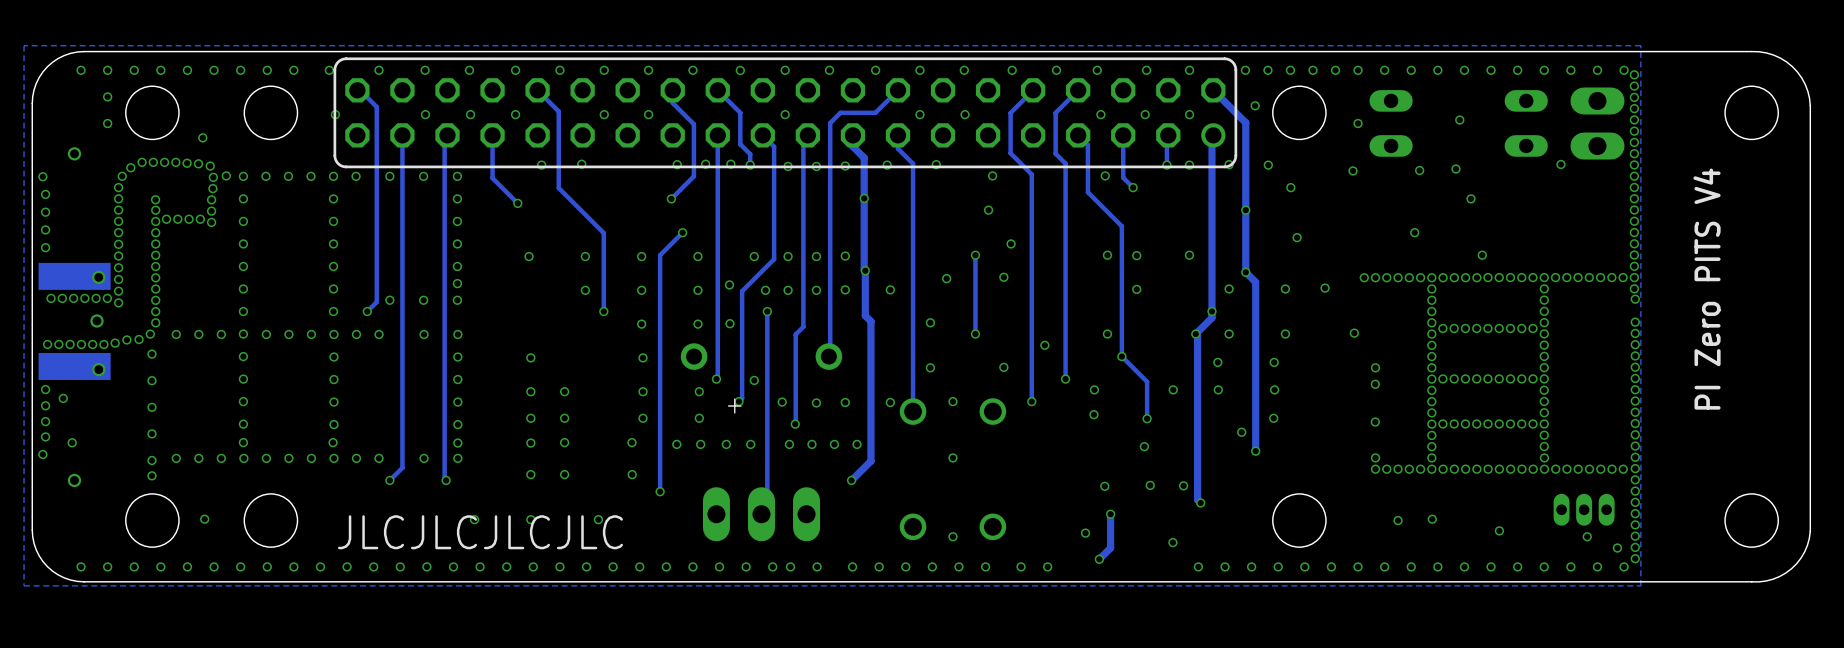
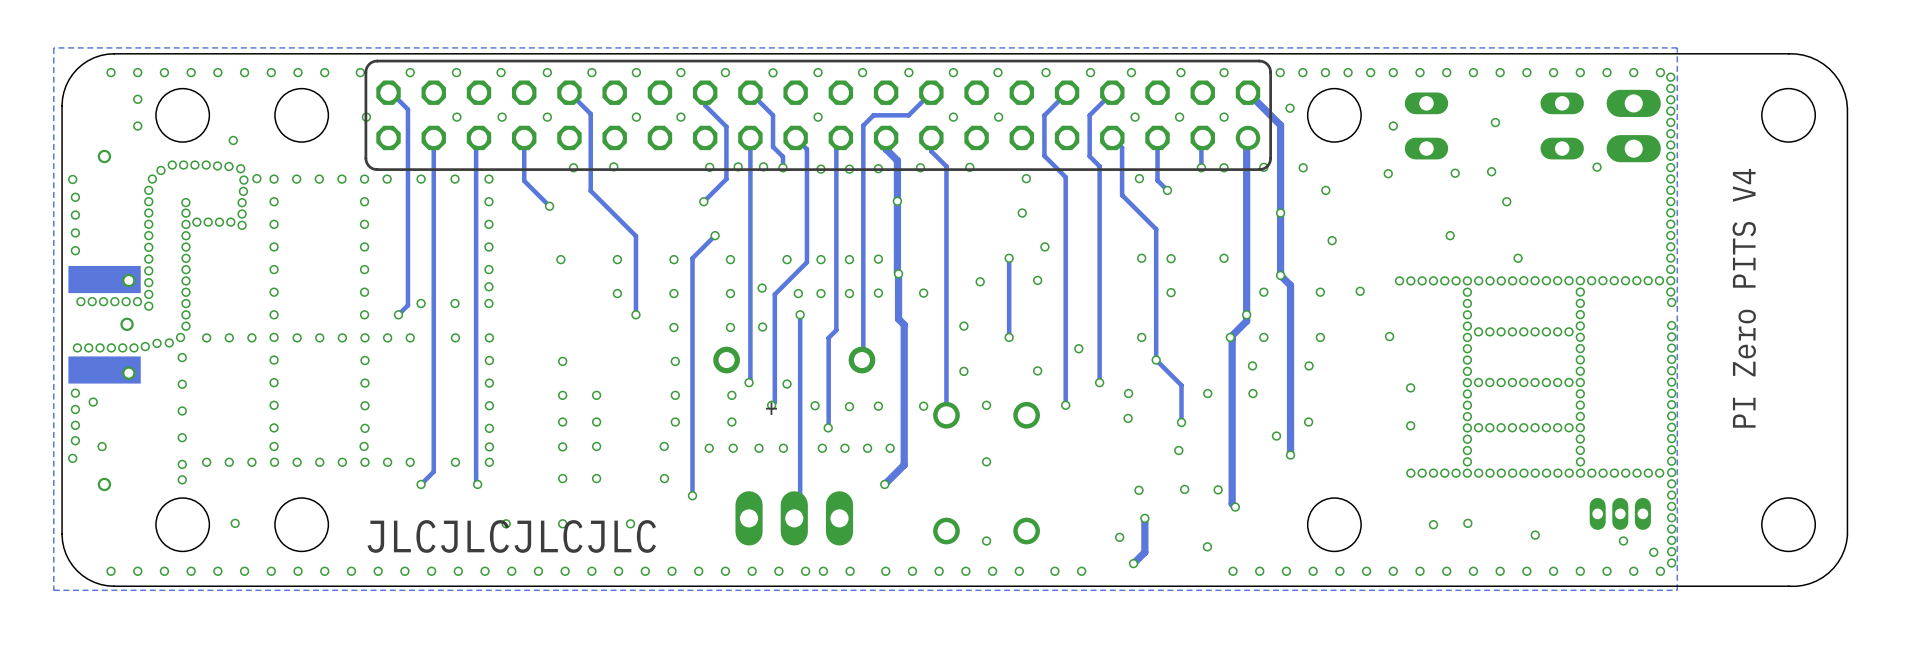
via: (1375, 367) -> none
via: (1274, 389) -> none
via: (1375, 457) -> none

